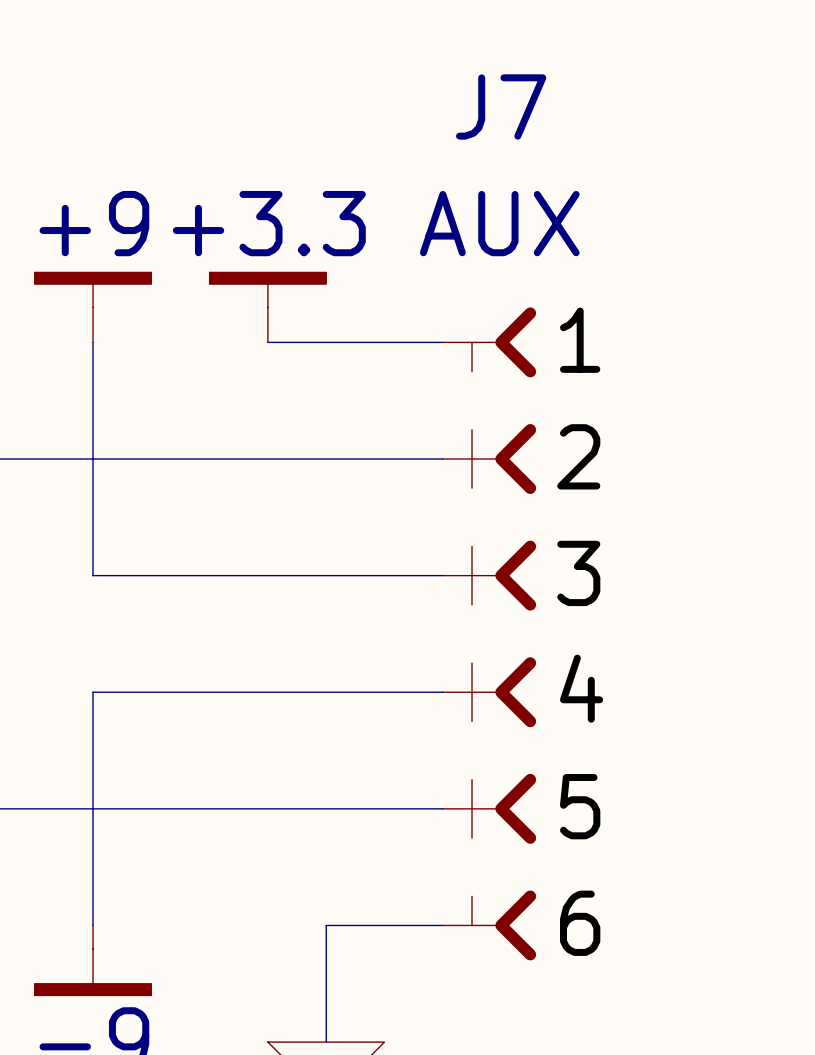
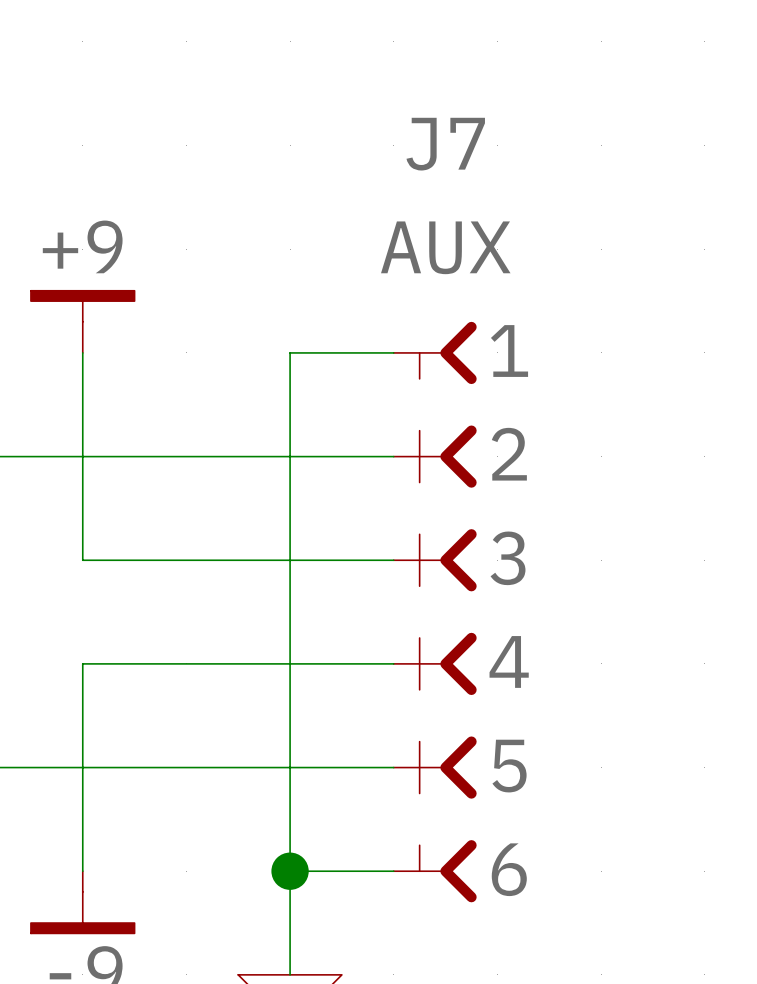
power symbol: +3.3 (267, 307) -> none
wire: (267, 342) (326, 342) -> (290, 871) (290, 352)
junction: none -> (290, 871)

